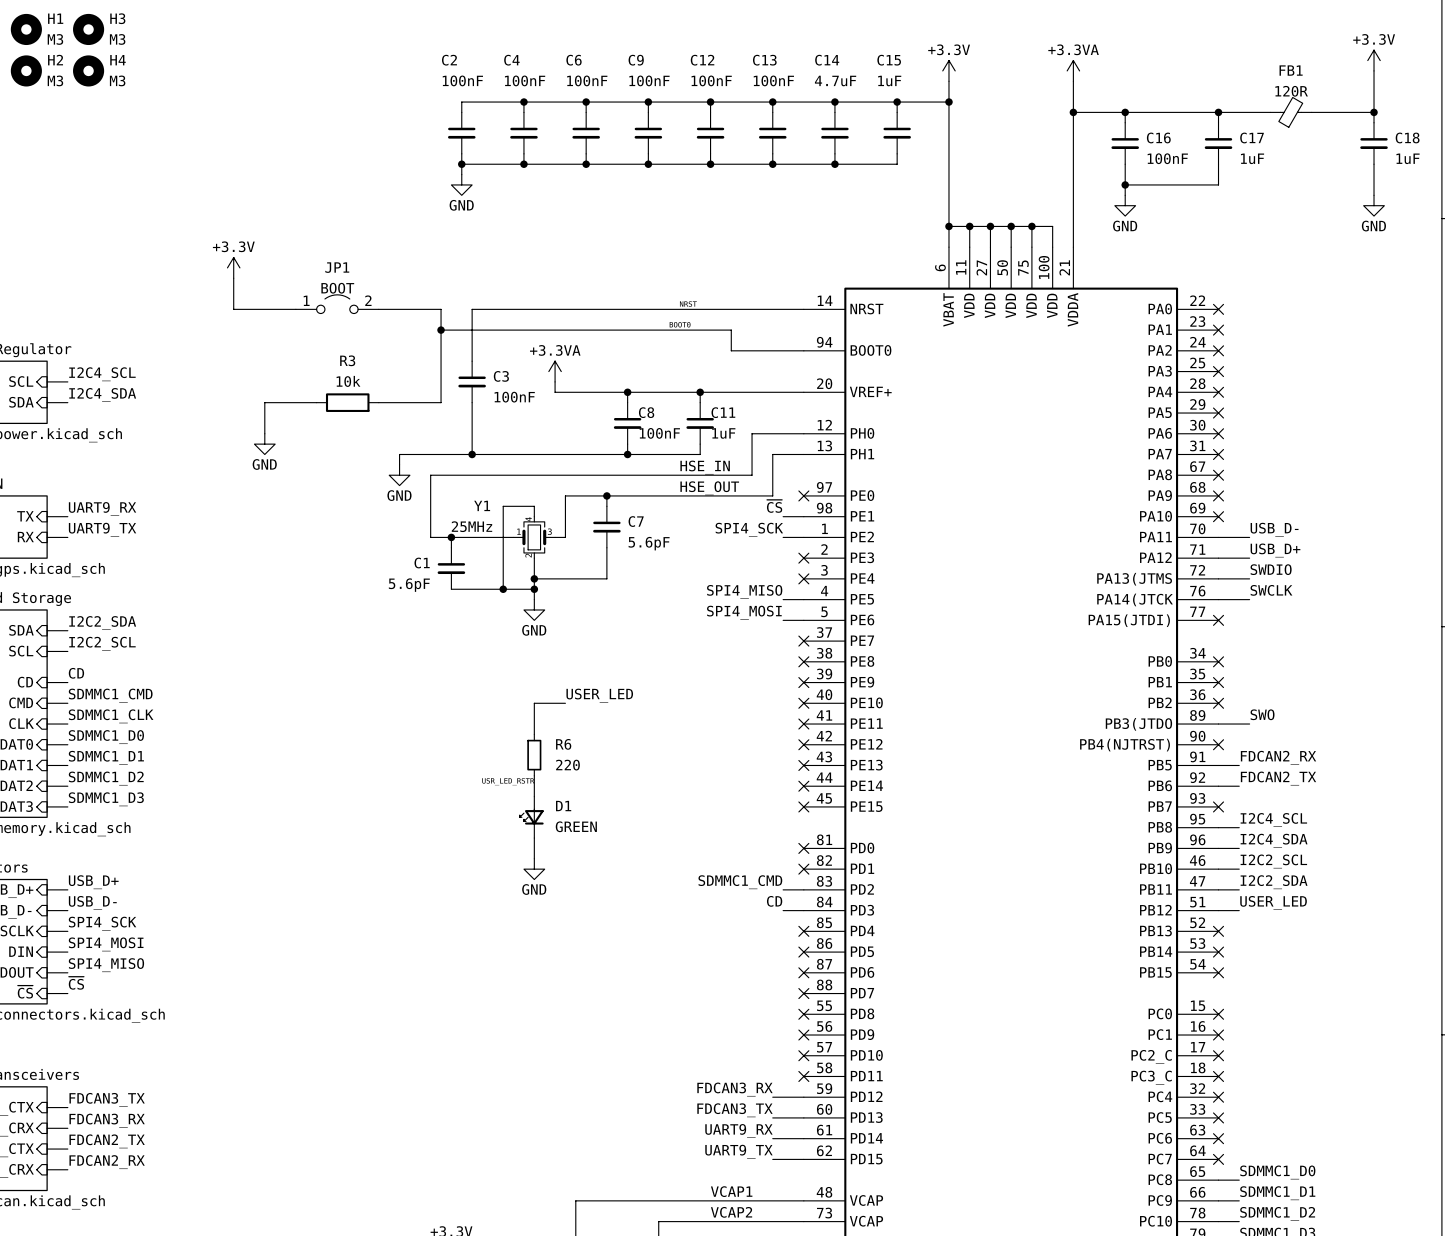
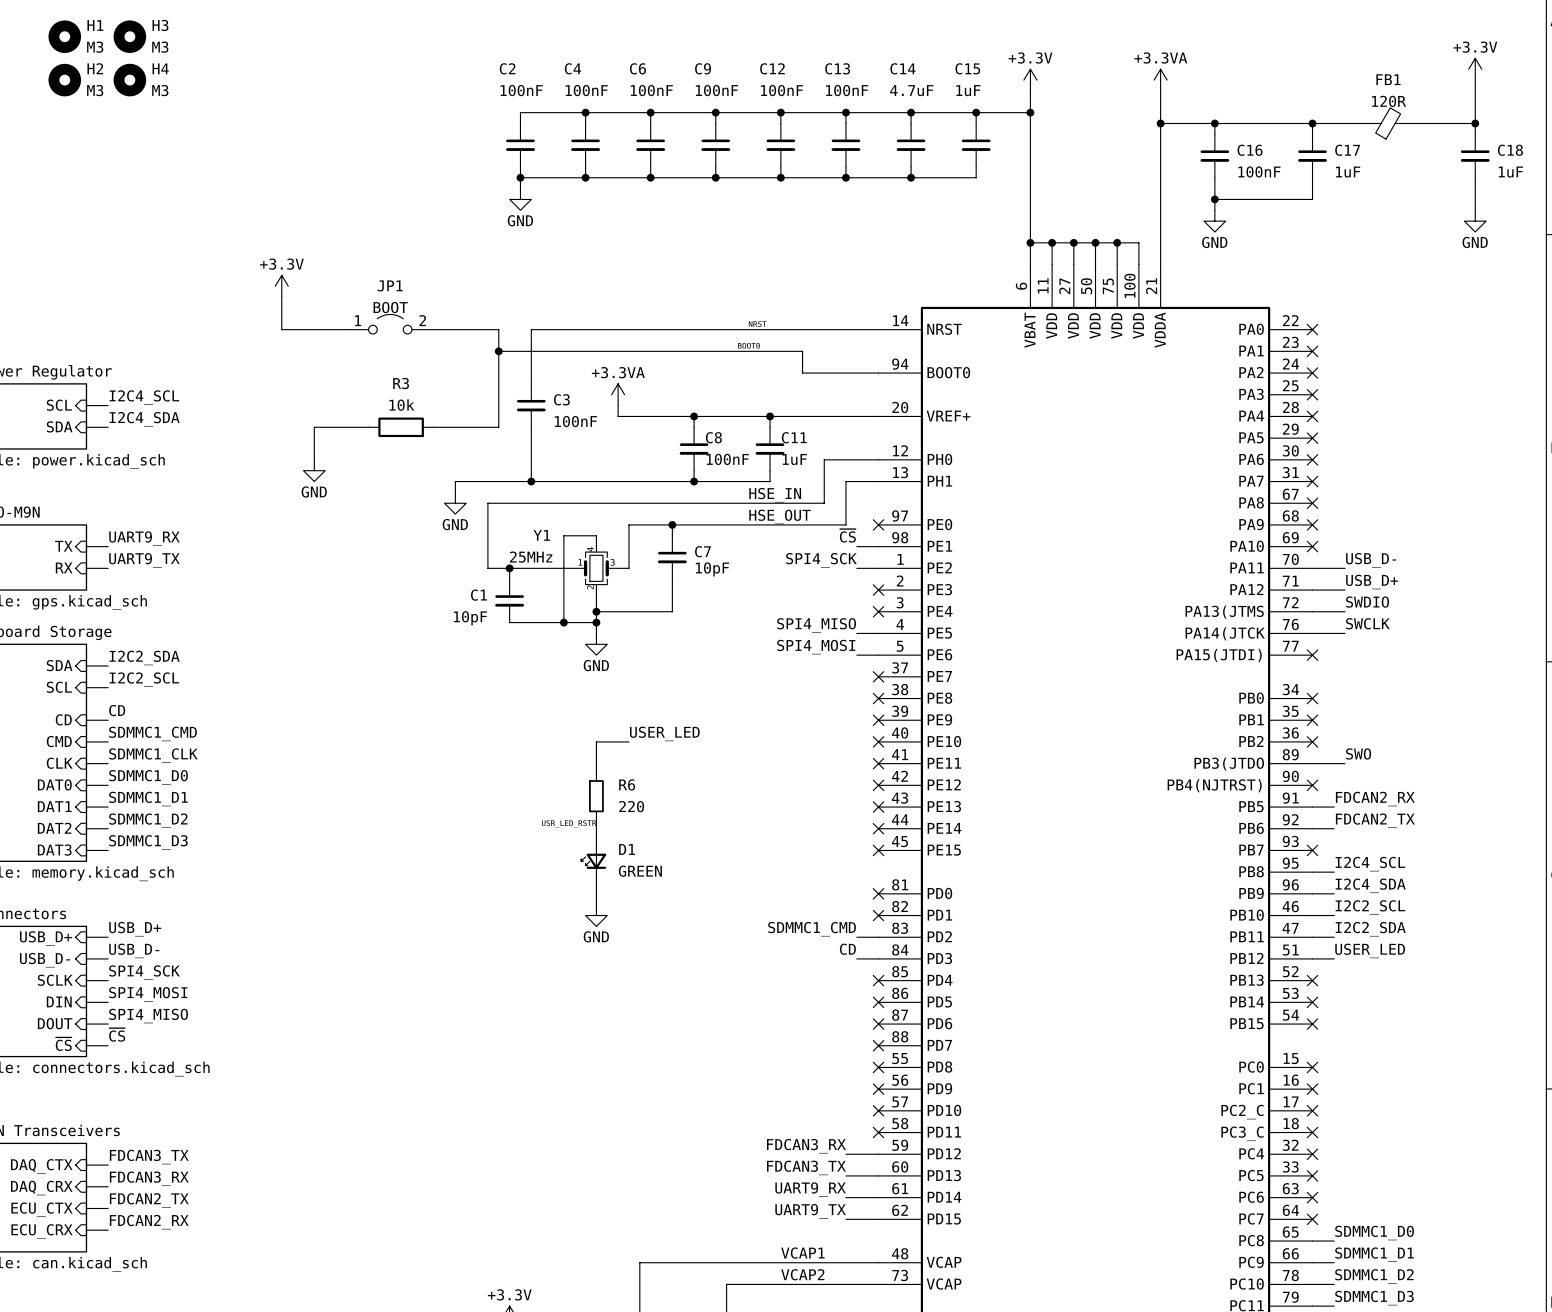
C7 value: 5.6pF (649, 543) -> 10pF (712, 569)
C1 value: 5.6pF (409, 585) -> 10pF (470, 618)

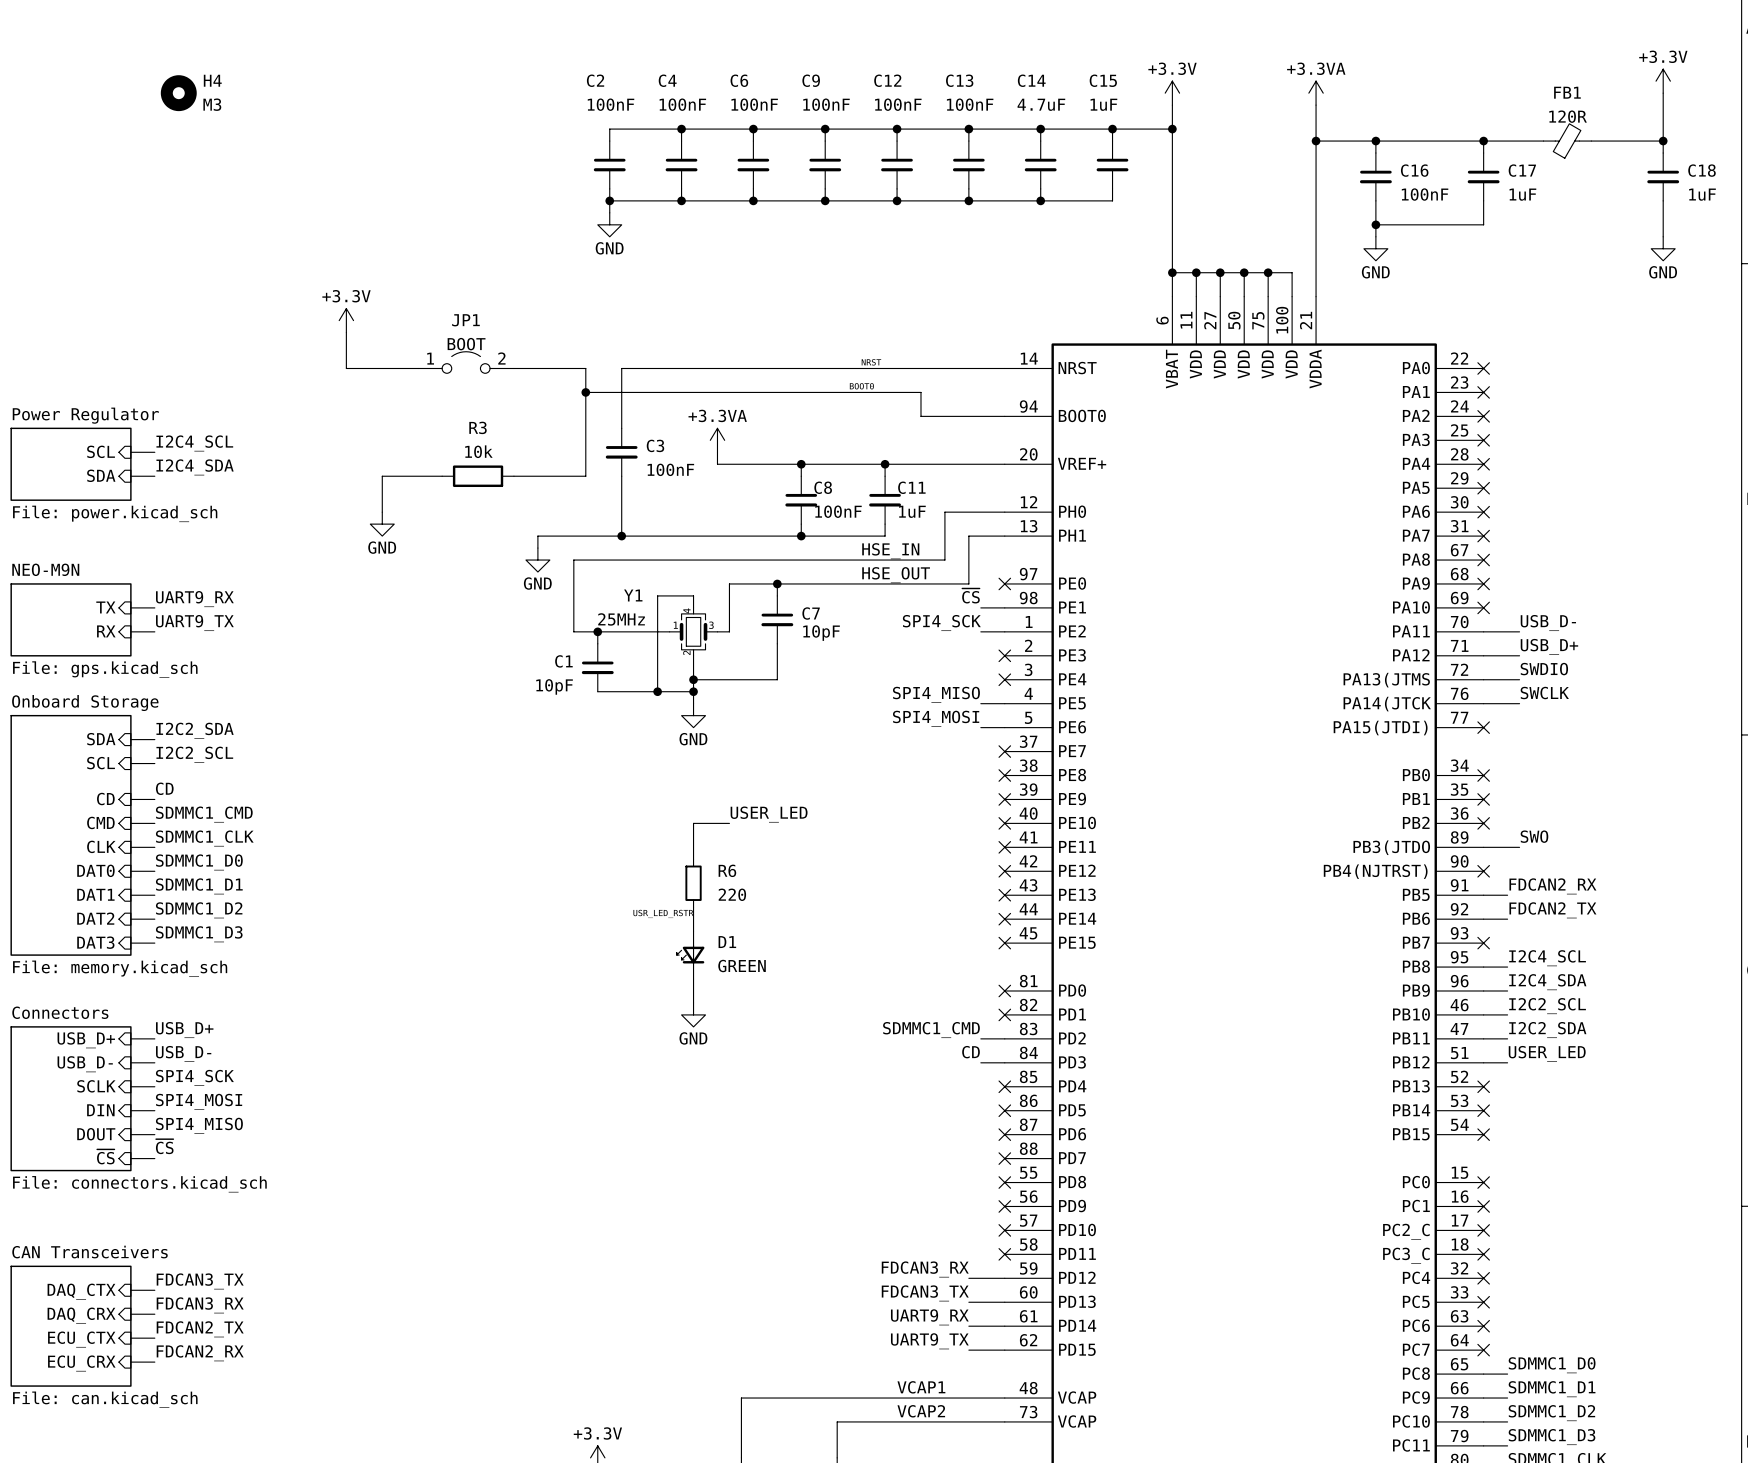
H1: M3 (64, 36) -> none
H3: M3 (129, 36) -> none
H2: M3 (64, 80) -> none

